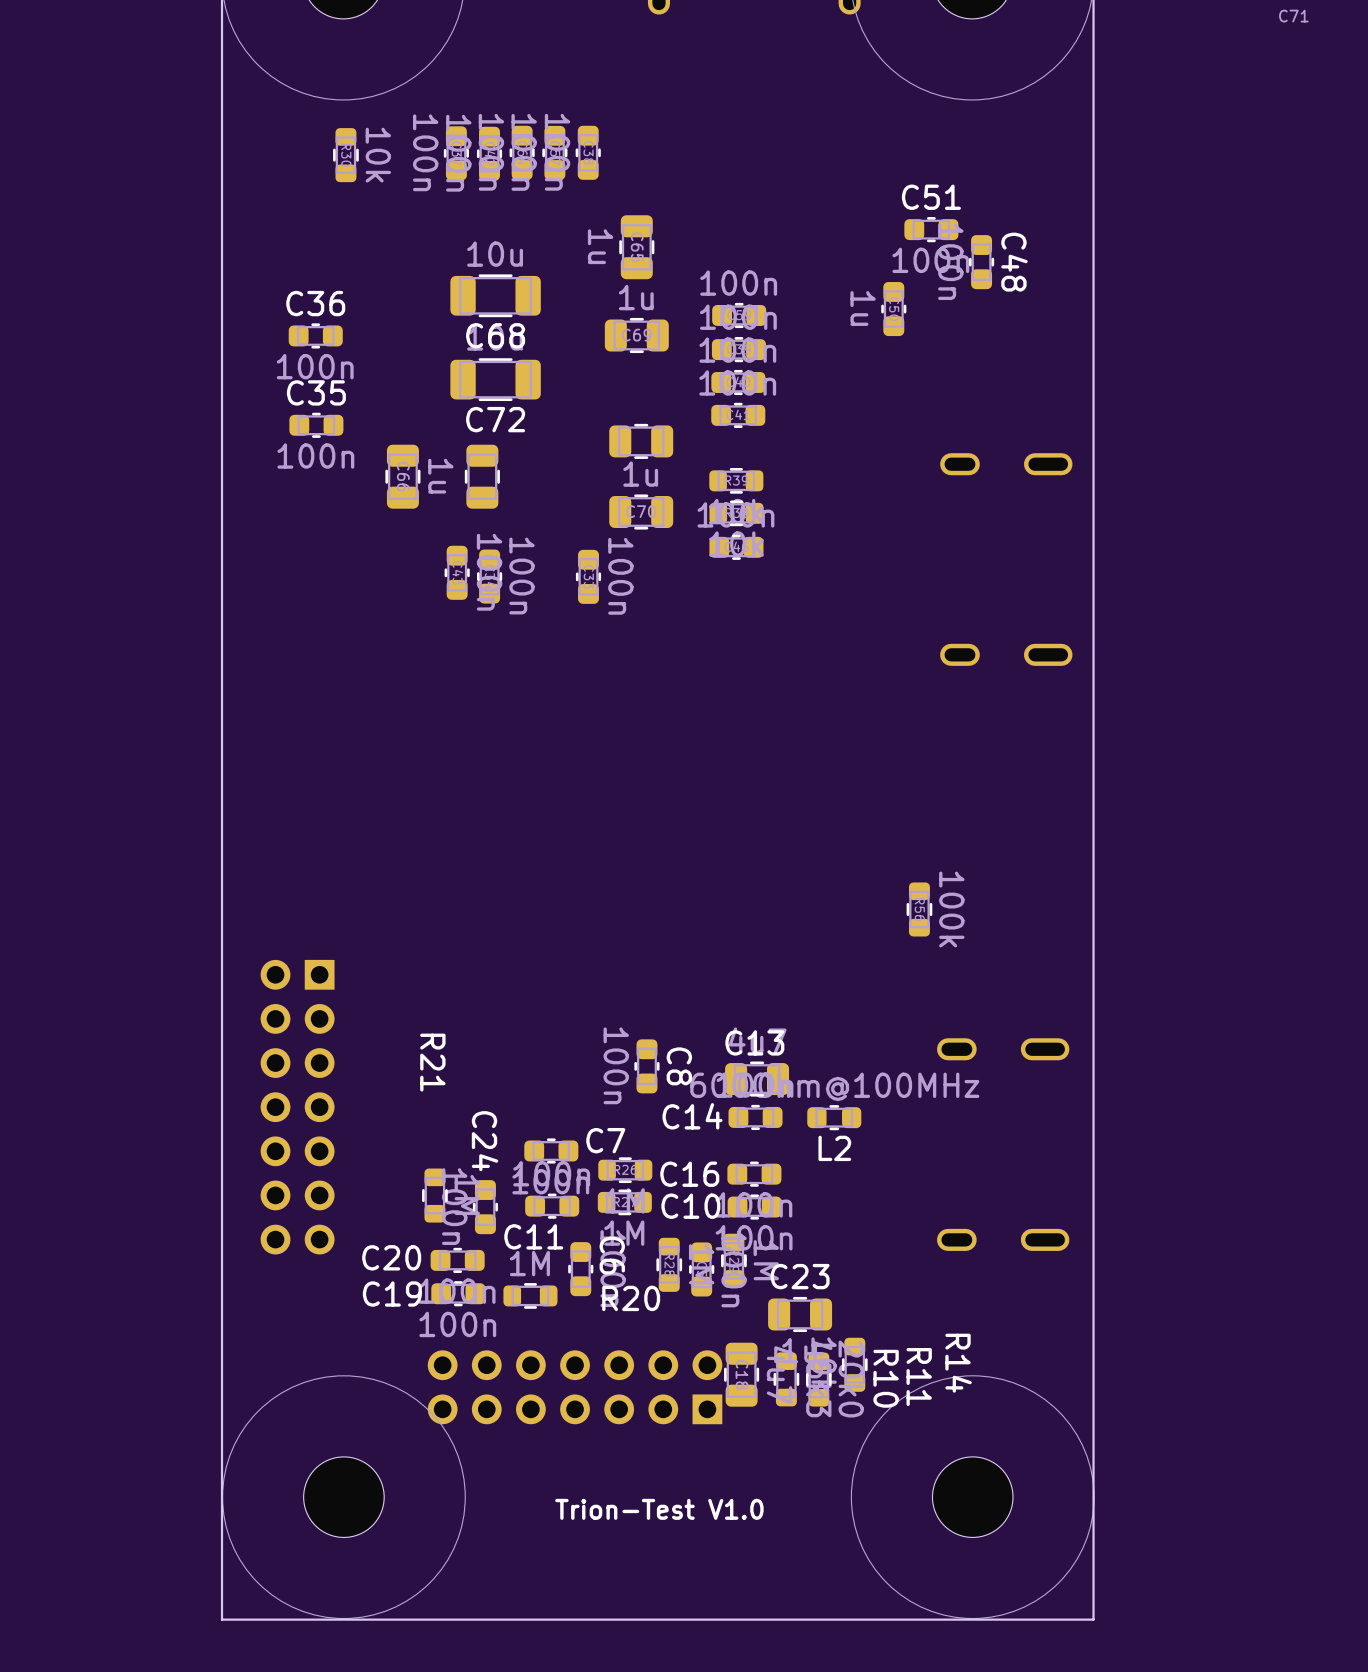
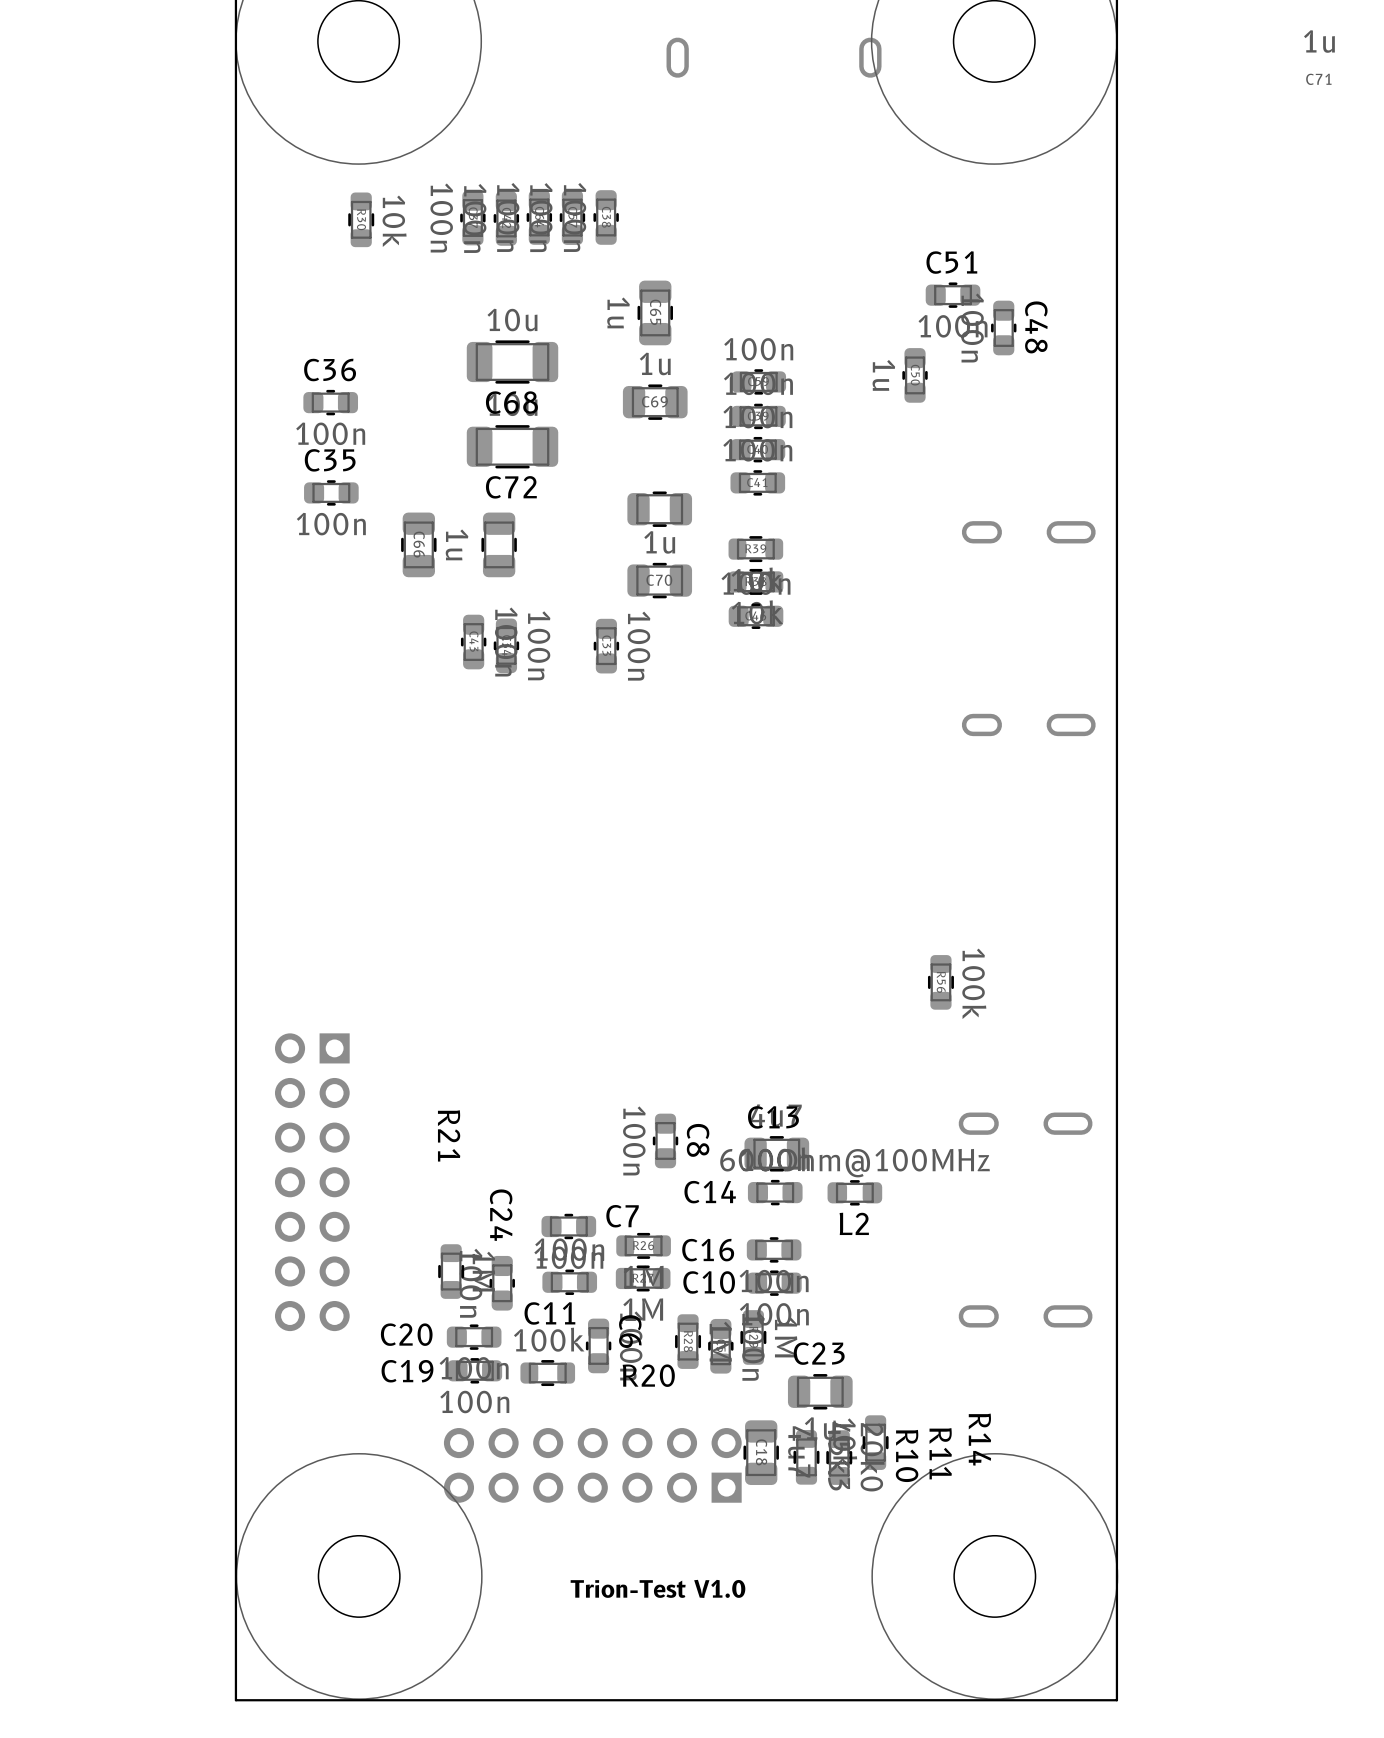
R20 value: 1M (529, 1263) -> 100k (549, 1339)

